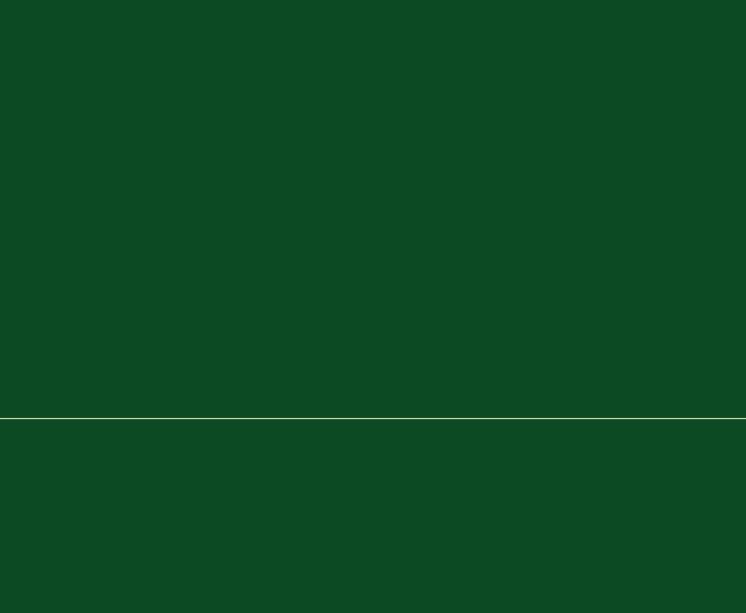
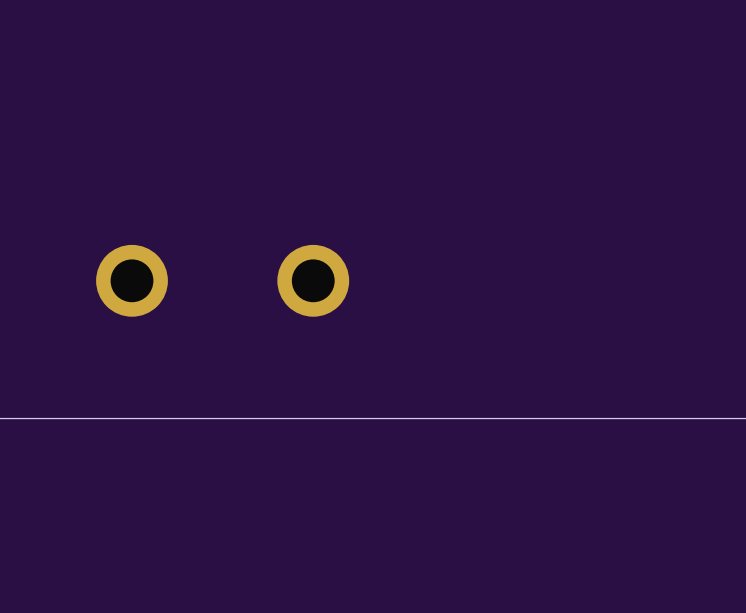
via: none -> (132, 280)
via: none -> (313, 280)

